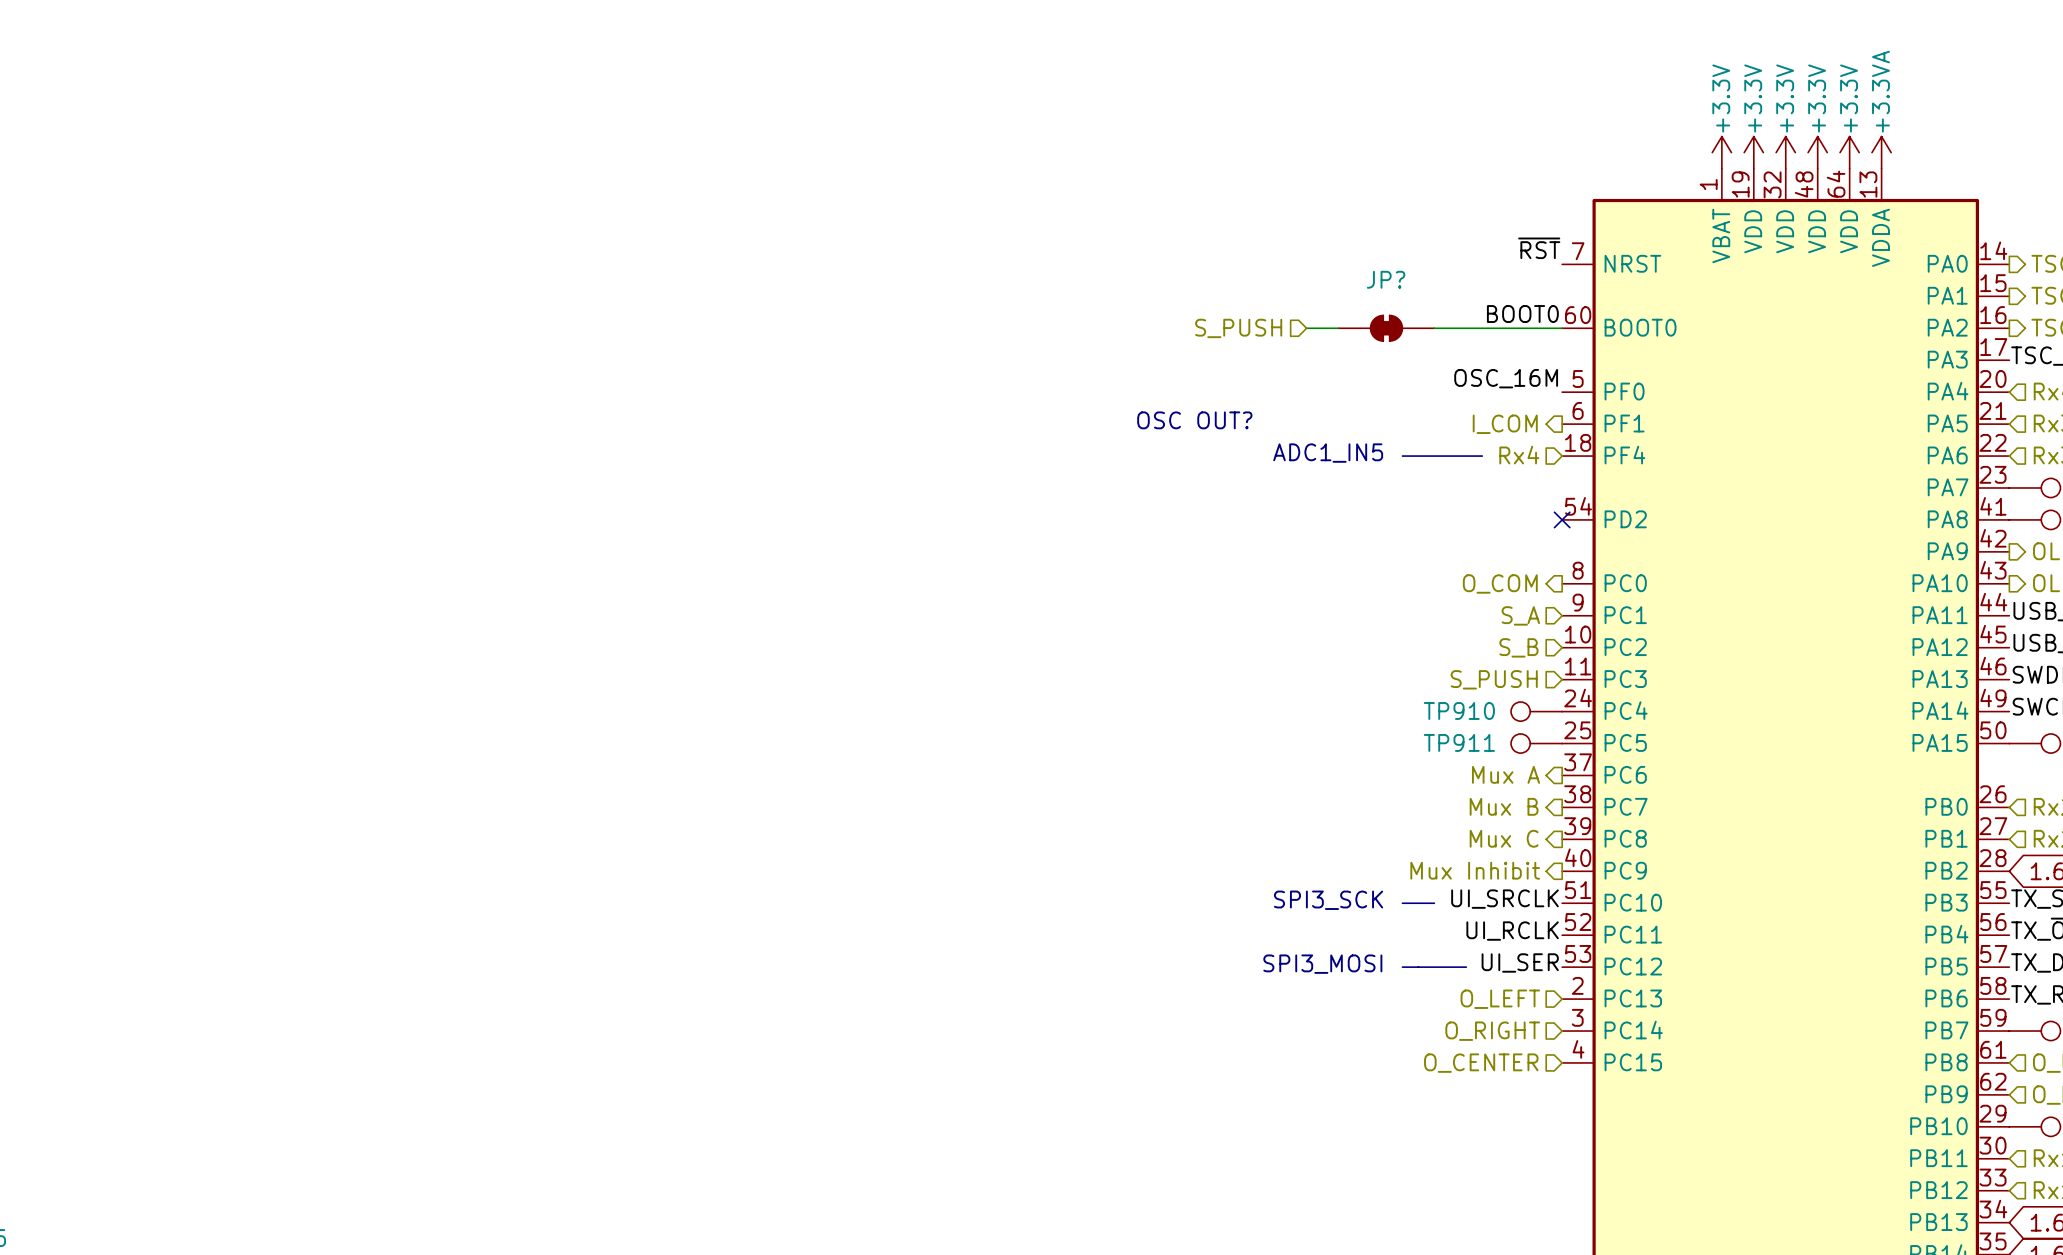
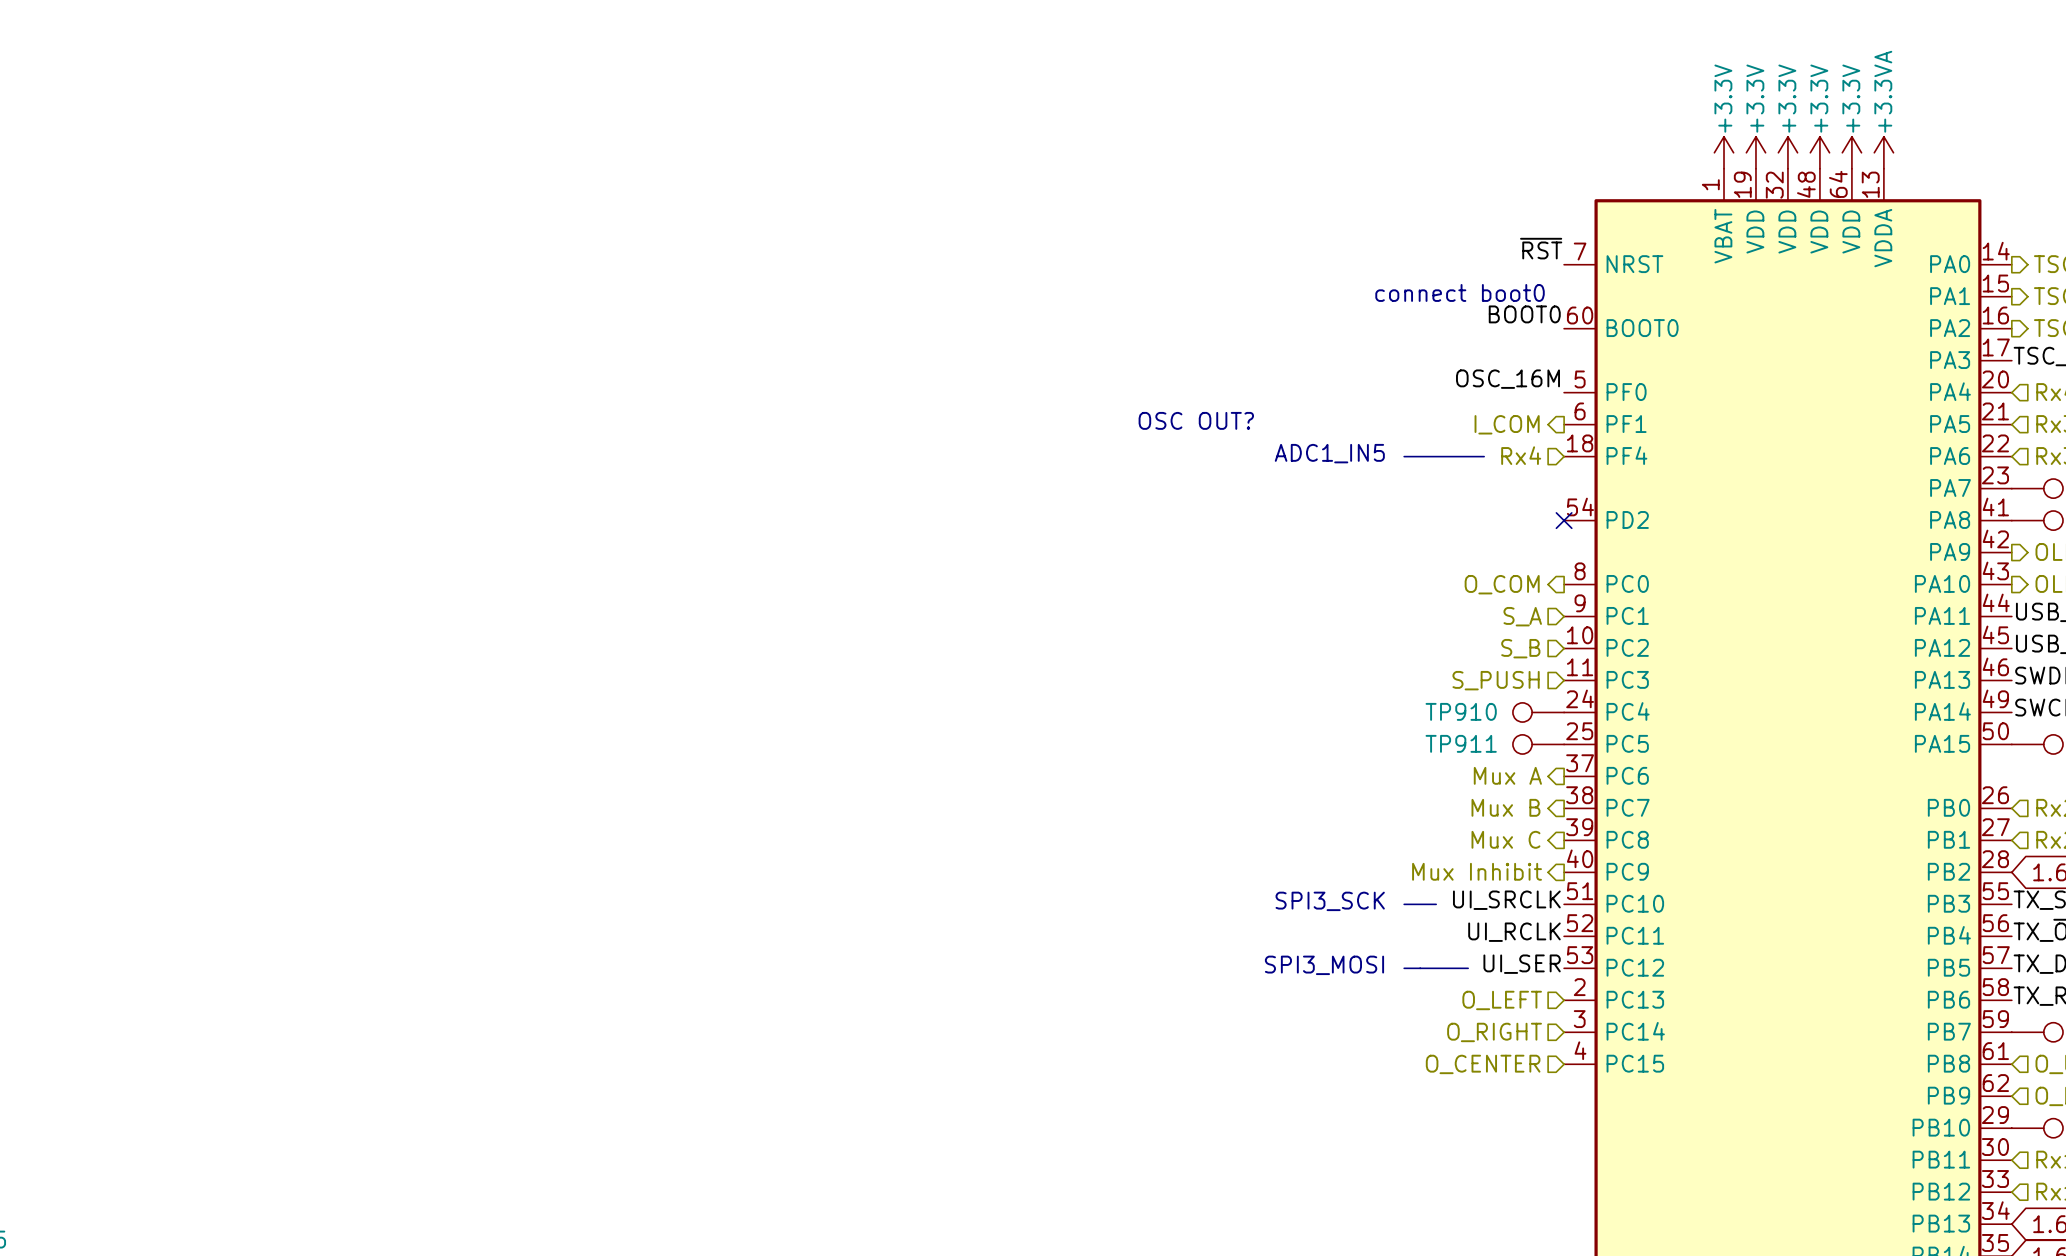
text: none -> connect boot0 (1460, 292)
hierarchical label: S_PUSH (1238, 328) -> none
wire: (1306, 328) (1338, 328) -> none
JP?: (1386, 328) -> none
wire: (1434, 328) (1562, 328) -> none

